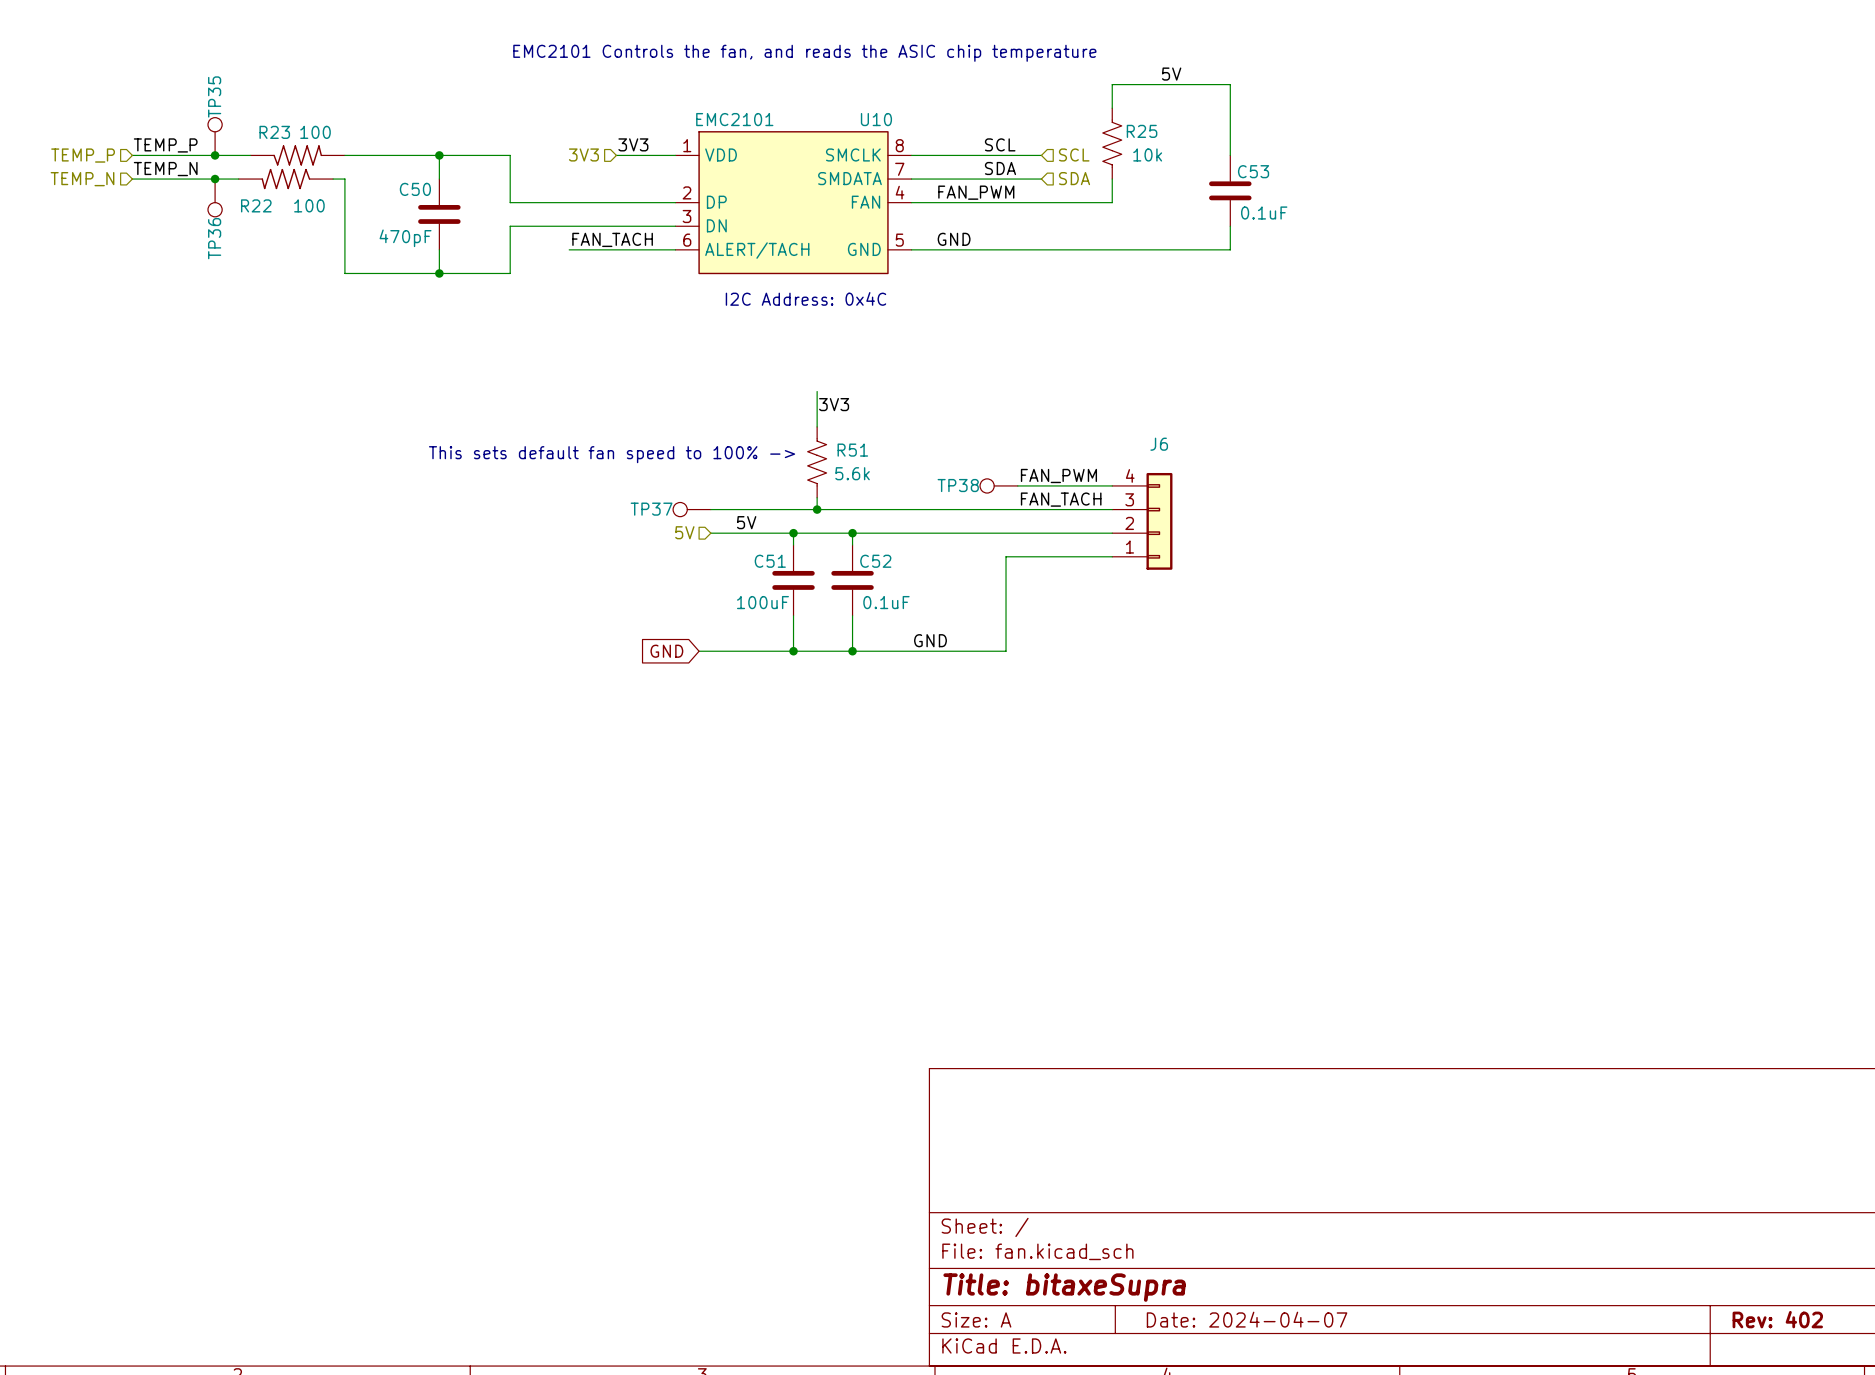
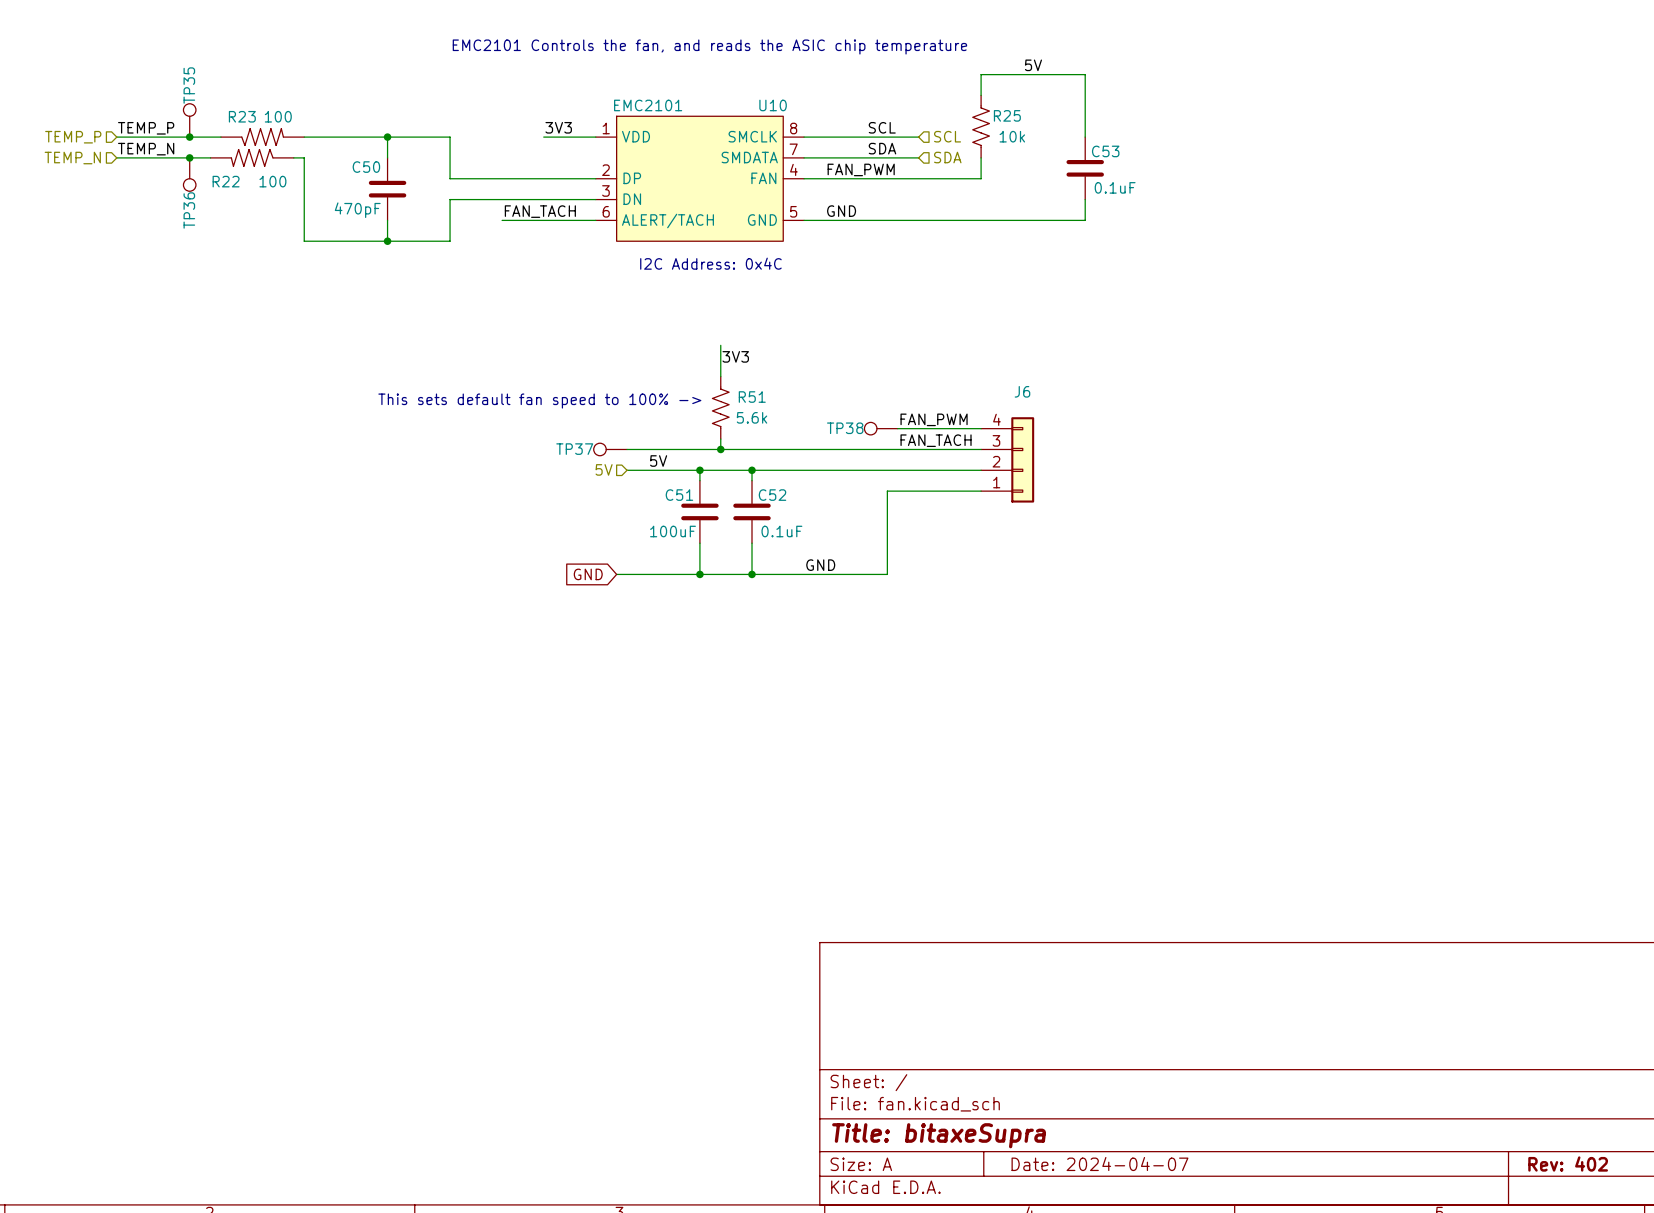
hierarchical label: 3V3 (583, 154) -> none

